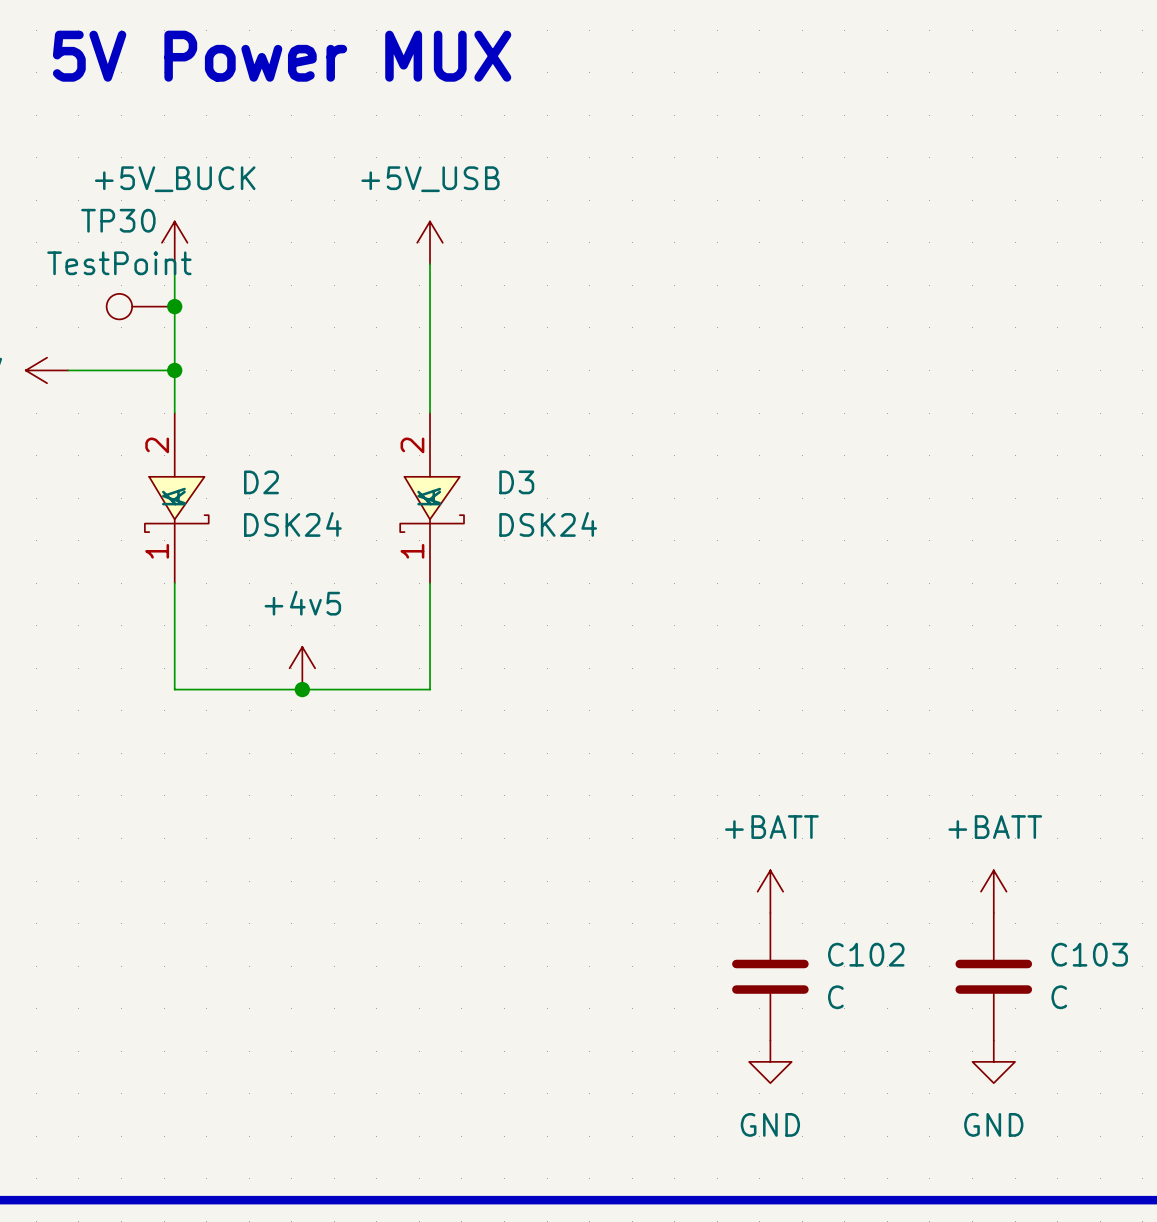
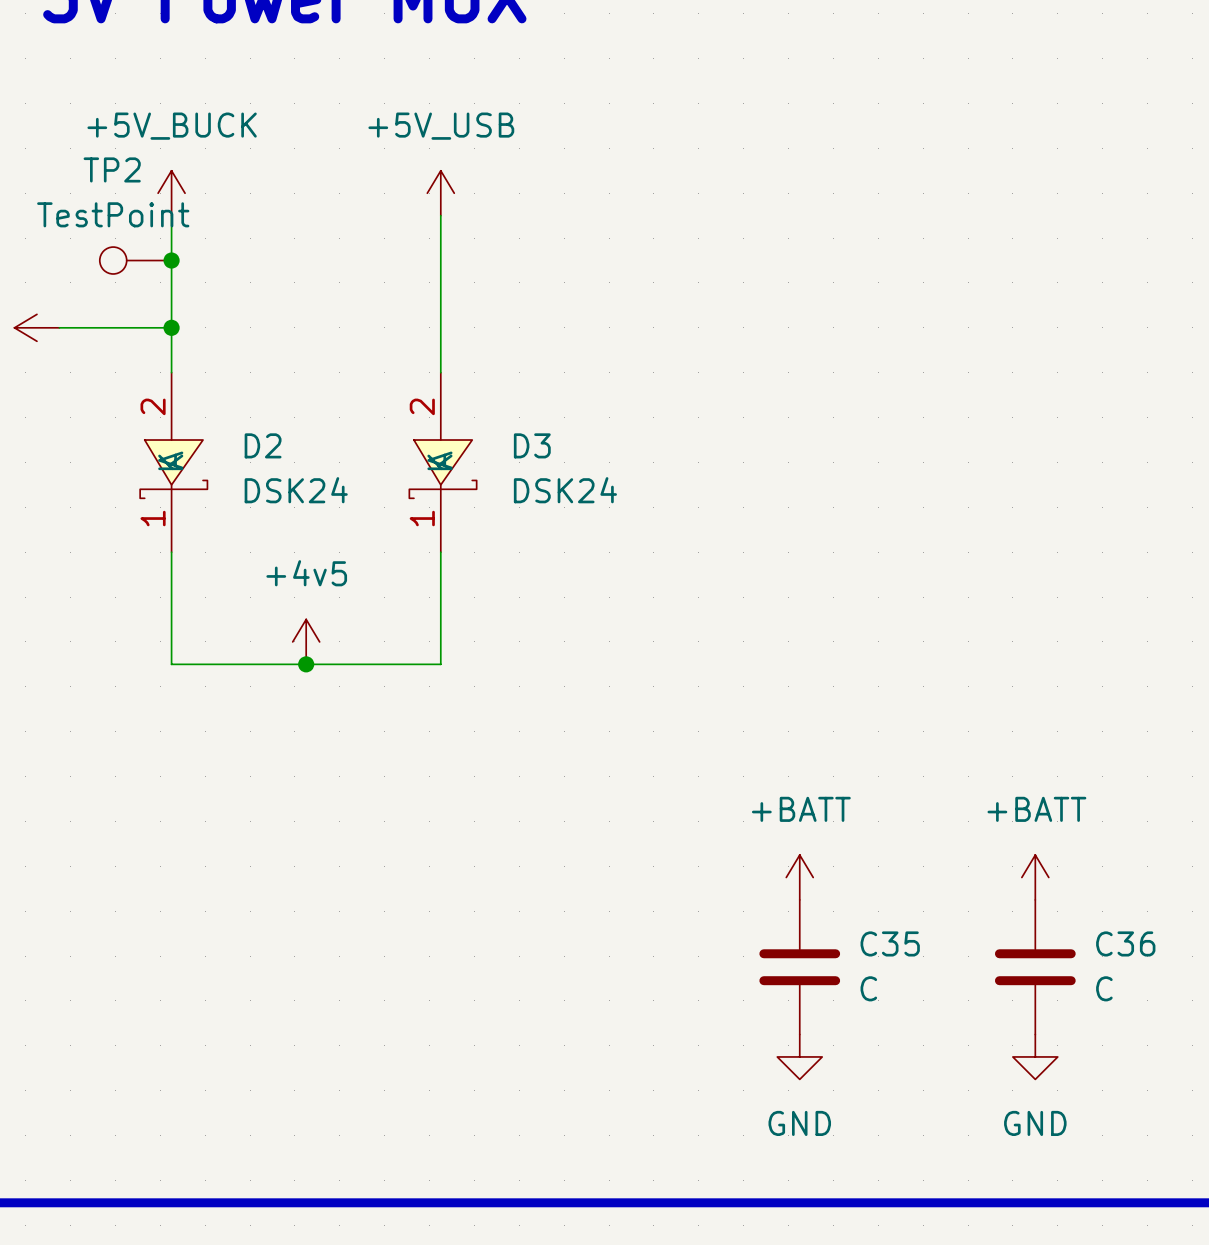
TP30 name: TP30 (118, 220) -> TP2 (112, 169)
C102 name: C102 (866, 954) -> C35 (890, 943)
C103 name: C103 (1089, 954) -> C36 (1125, 943)

